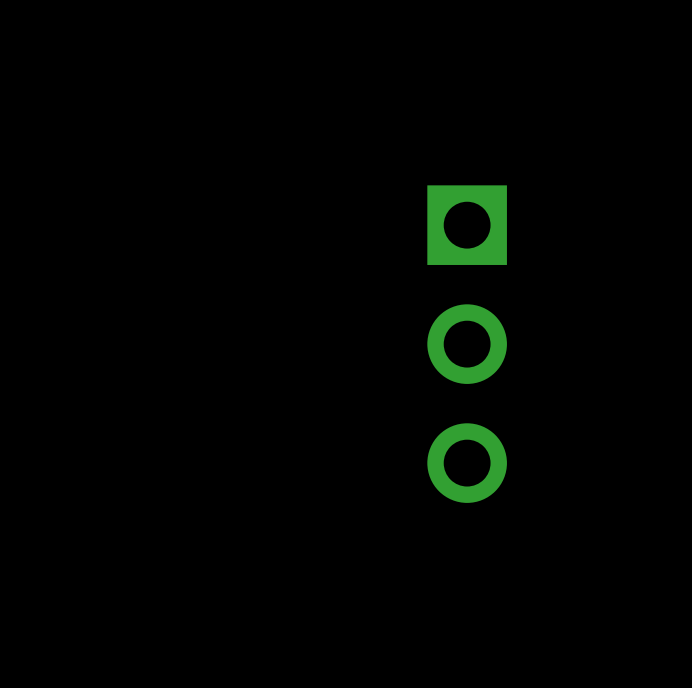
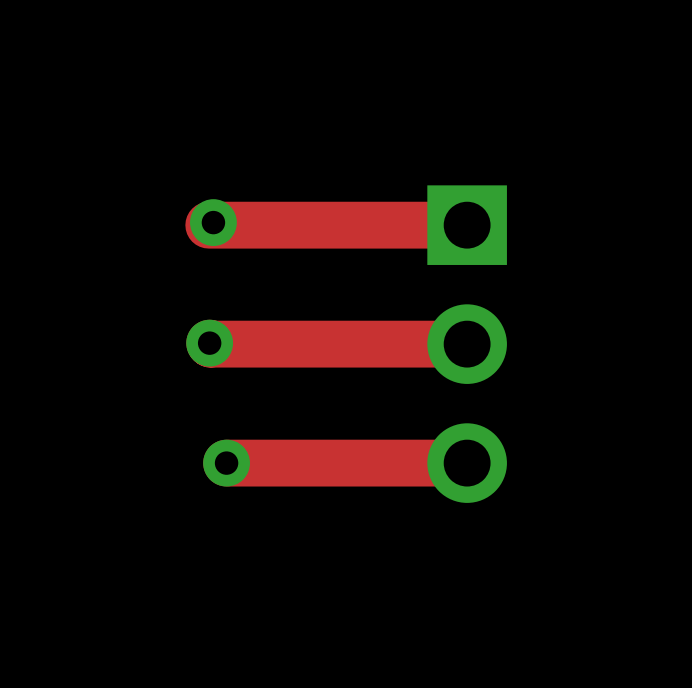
via: none -> (213, 222)
top track: none -> (467, 225) (208, 225)
top track: none -> (209, 343) (467, 344)
via: none -> (209, 343)
via: none -> (226, 463)
top track: none -> (467, 463) (226, 463)

